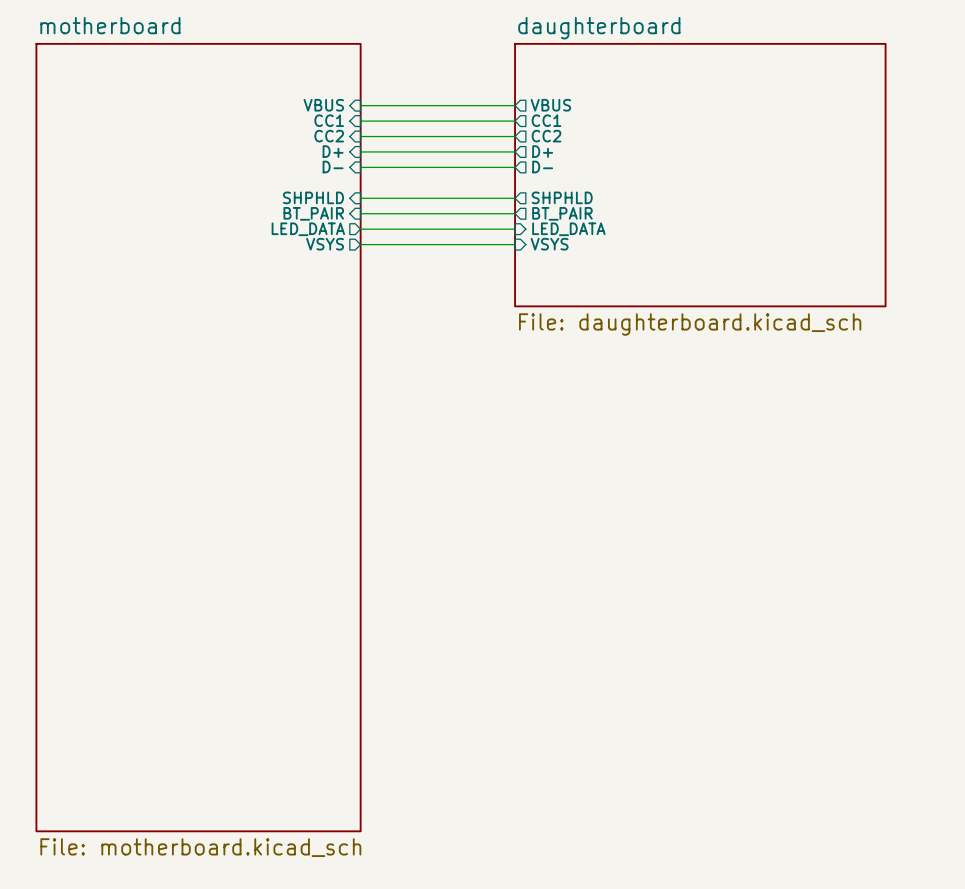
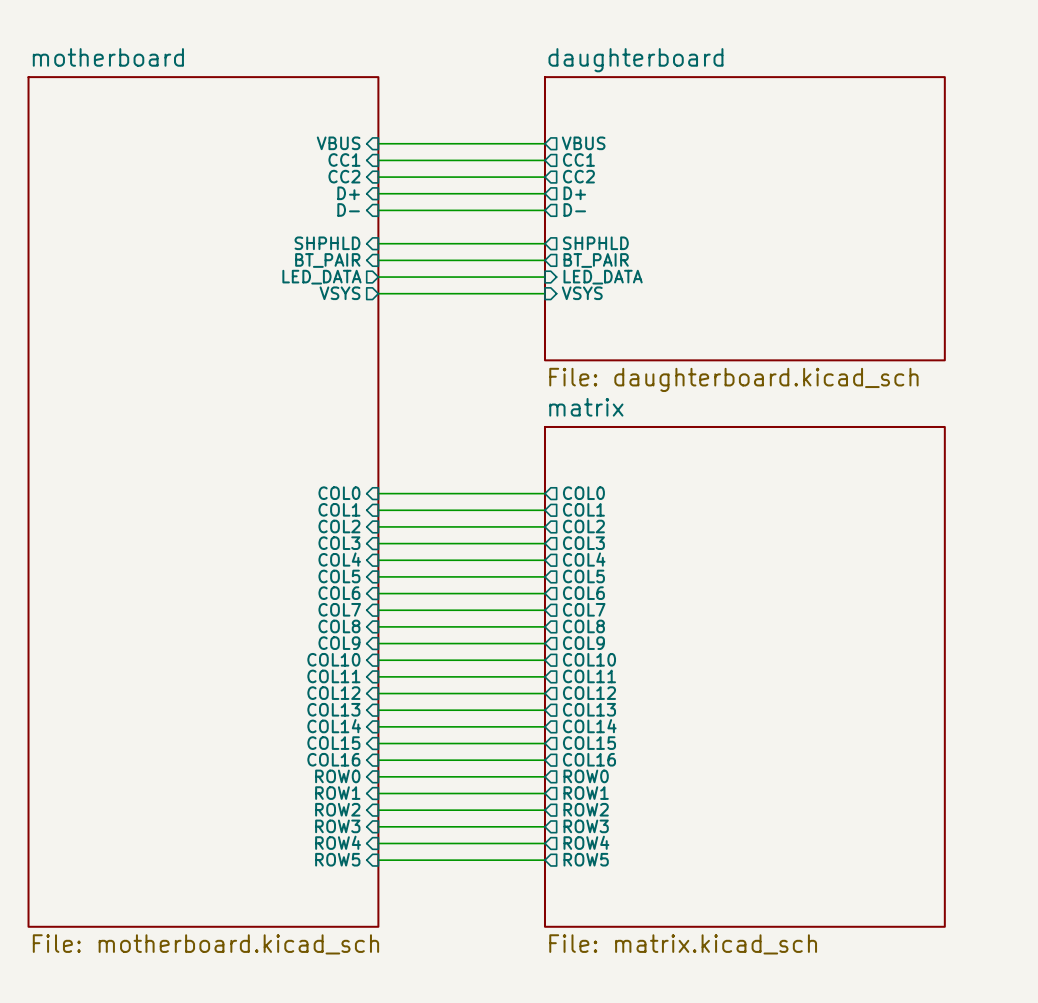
sheet pin: none -> COL0 (339, 493)
wire: none -> (378, 493) (544, 493)
sheet pin: none -> COL0 (583, 493)
sheet pin: none -> COL1 (339, 509)
sheet pin: none -> COL1 (583, 509)
wire: none -> (378, 510) (544, 510)
sheet pin: none -> COL2 (339, 526)
wire: none -> (378, 526) (544, 526)
sheet pin: none -> COL2 (583, 526)
sheet pin: none -> COL3 (339, 543)
sheet pin: none -> COL3 (583, 543)
wire: none -> (378, 543) (544, 543)
sheet pin: none -> COL4 (339, 559)
sheet pin: none -> COL4 (584, 559)
wire: none -> (378, 560) (544, 560)
sheet pin: none -> COL5 (339, 576)
sheet pin: none -> COL5 (583, 576)
wire: none -> (378, 576) (544, 576)
sheet pin: none -> COL6 (339, 593)
wire: none -> (378, 593) (544, 593)
sheet pin: none -> COL6 (583, 593)
sheet pin: none -> COL7 (339, 609)
wire: none -> (378, 610) (544, 610)
sheet pin: none -> COL7 (584, 609)
sheet pin: none -> COL8 (339, 626)
sheet pin: none -> COL8 (583, 626)
wire: none -> (378, 626) (544, 626)
sheet pin: none -> COL9 (339, 643)
wire: none -> (378, 643) (544, 643)
sheet pin: none -> COL9 (583, 643)
sheet pin: none -> COL10 (333, 659)
sheet pin: none -> COL10 (589, 659)
wire: none -> (378, 660) (544, 660)
sheet pin: none -> COL11 (333, 676)
wire: none -> (378, 676) (544, 676)
sheet pin: none -> COL11 (589, 676)
sheet matrix: none -> File: matrix.kicad_sch (744, 676)
sheet pin: none -> COL12 (333, 693)
sheet pin: none -> COL12 (589, 693)
wire: none -> (378, 693) (544, 693)
sheet pin: none -> COL13 (333, 709)
wire: none -> (378, 710) (544, 710)
sheet pin: none -> COL13 (589, 709)
sheet pin: none -> COL14 (334, 726)
sheet pin: none -> COL14 (589, 726)
wire: none -> (378, 726) (544, 726)
sheet pin: none -> COL15 (333, 743)
wire: none -> (378, 743) (544, 743)
sheet pin: none -> COL15 (589, 743)
sheet pin: none -> COL16 (333, 759)
wire: none -> (378, 760) (544, 760)
sheet pin: none -> COL16 (589, 759)
sheet pin: none -> ROW0 (337, 776)
sheet pin: none -> ROW0 (586, 776)
wire: none -> (378, 776) (544, 776)
sheet pin: none -> ROW1 (337, 793)
wire: none -> (378, 793) (544, 793)
sheet pin: none -> ROW1 (586, 793)
sheet pin: none -> ROW2 (337, 809)
sheet pin: none -> ROW2 (586, 809)
wire: none -> (378, 810) (544, 810)
sheet pin: none -> ROW3 (337, 826)
wire: none -> (378, 826) (544, 826)
sheet pin: none -> ROW3 (586, 826)
sheet pin: none -> ROW4 (338, 842)
sheet pin: none -> ROW4 (586, 842)
wire: none -> (378, 843) (544, 843)
sheet pin: none -> ROW5 (337, 859)
wire: none -> (378, 860) (544, 860)
sheet pin: none -> ROW5 (586, 859)

